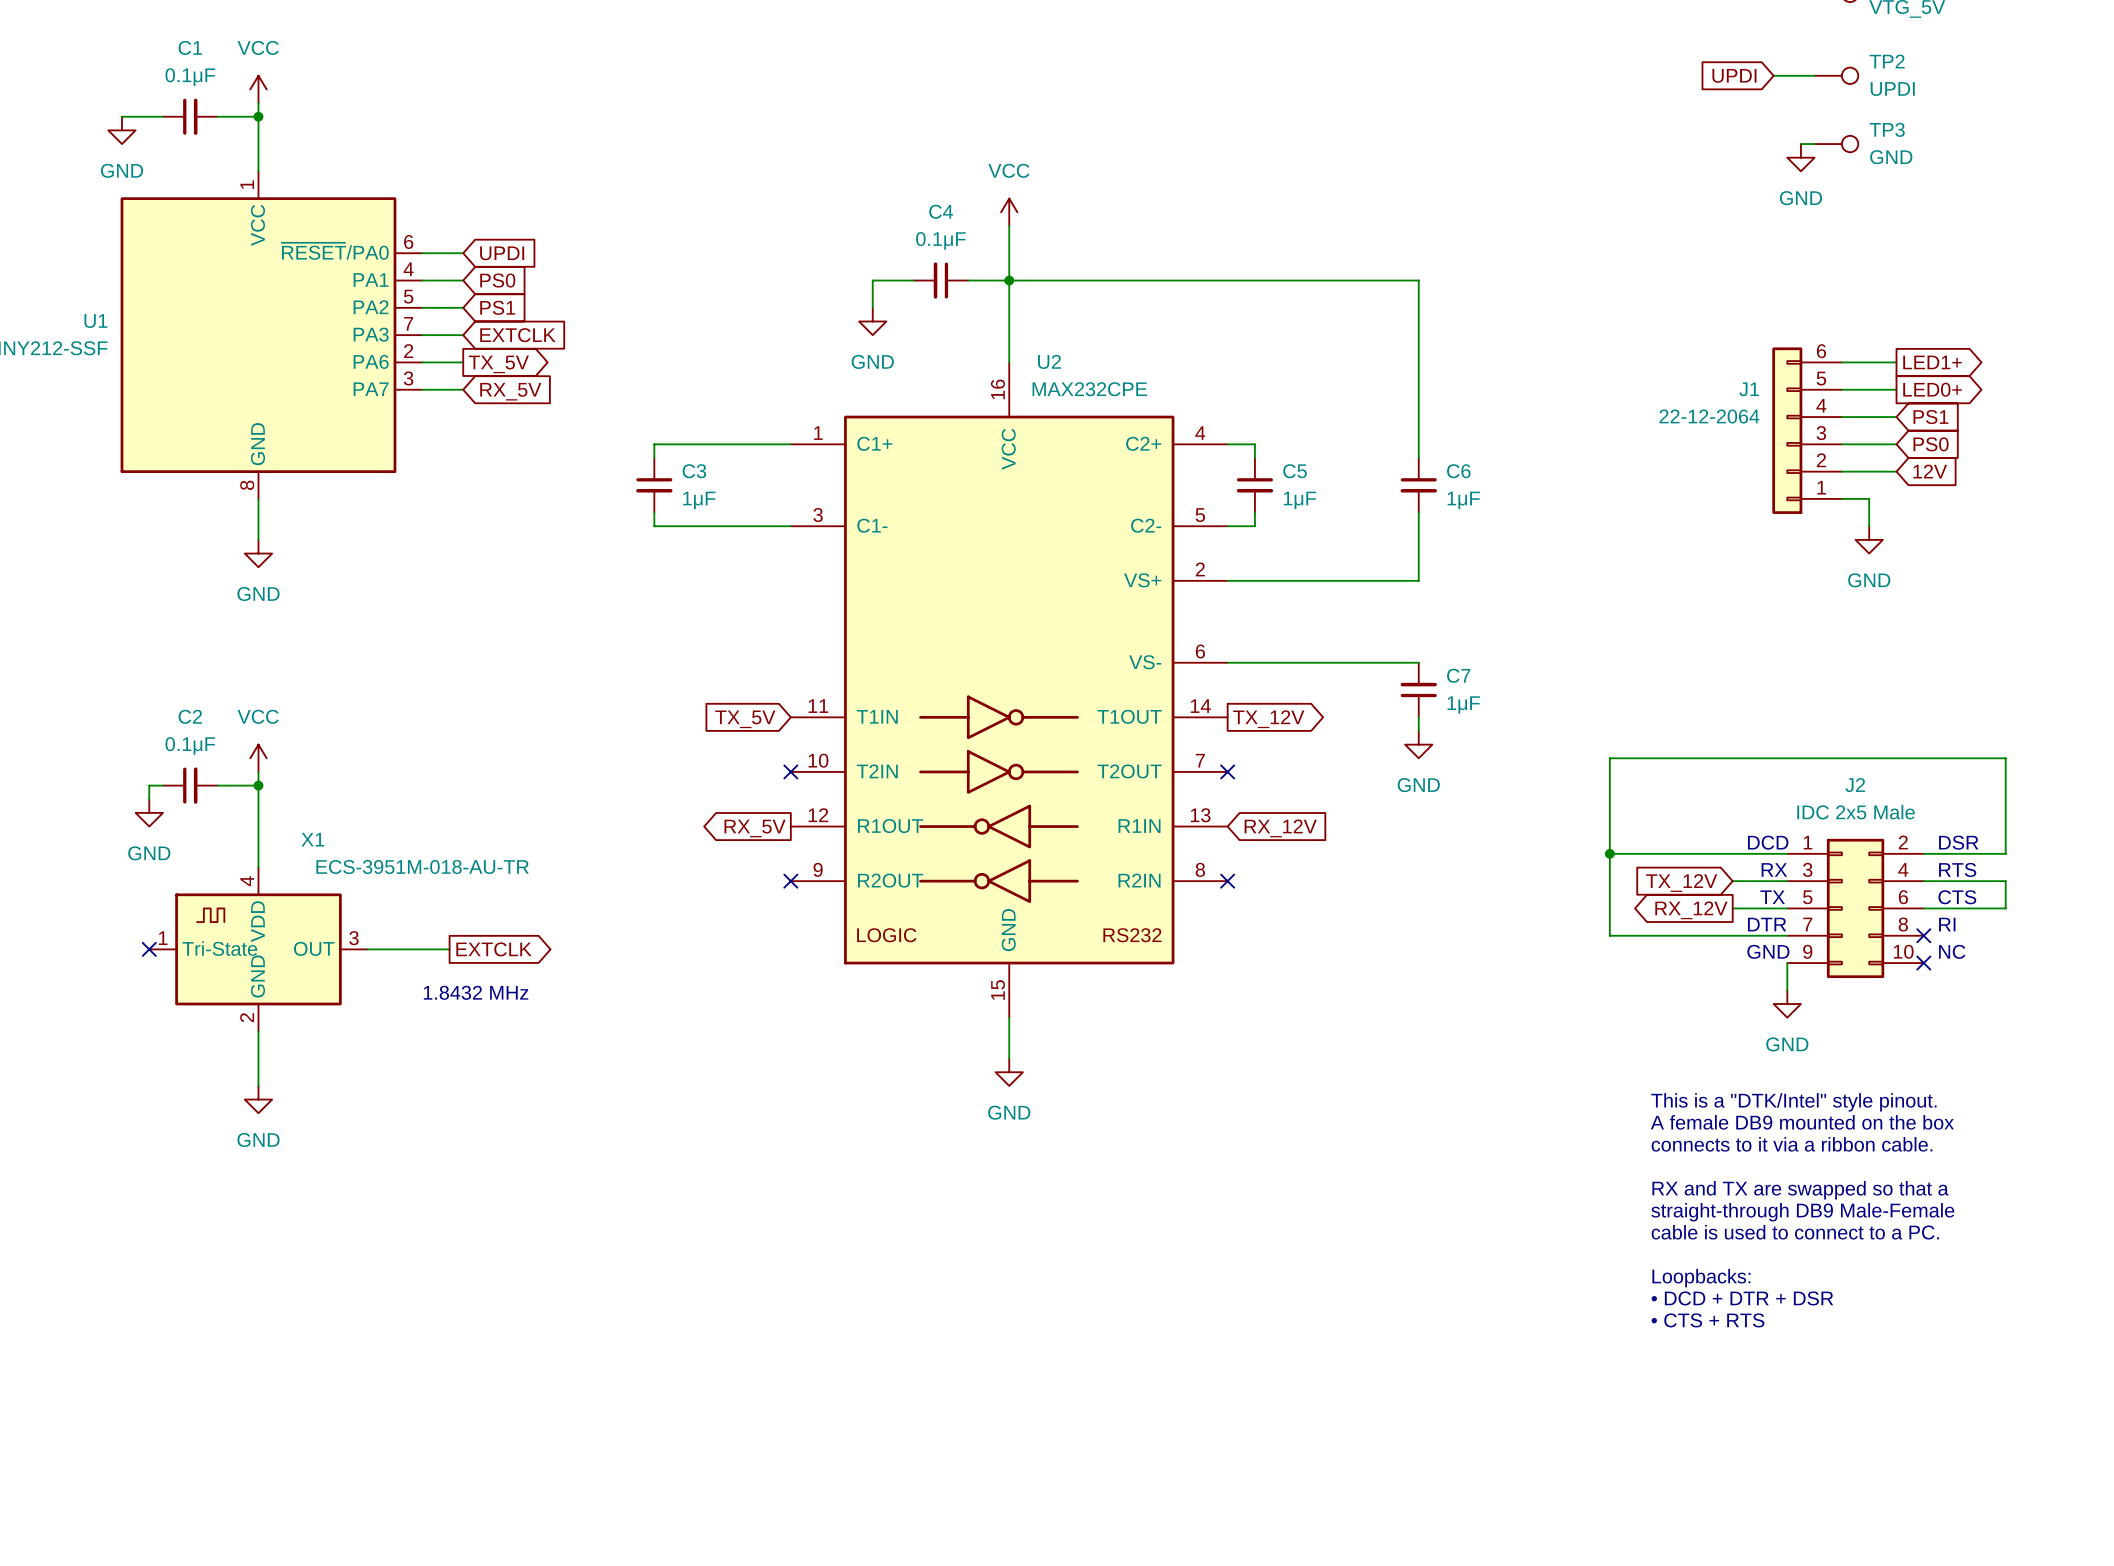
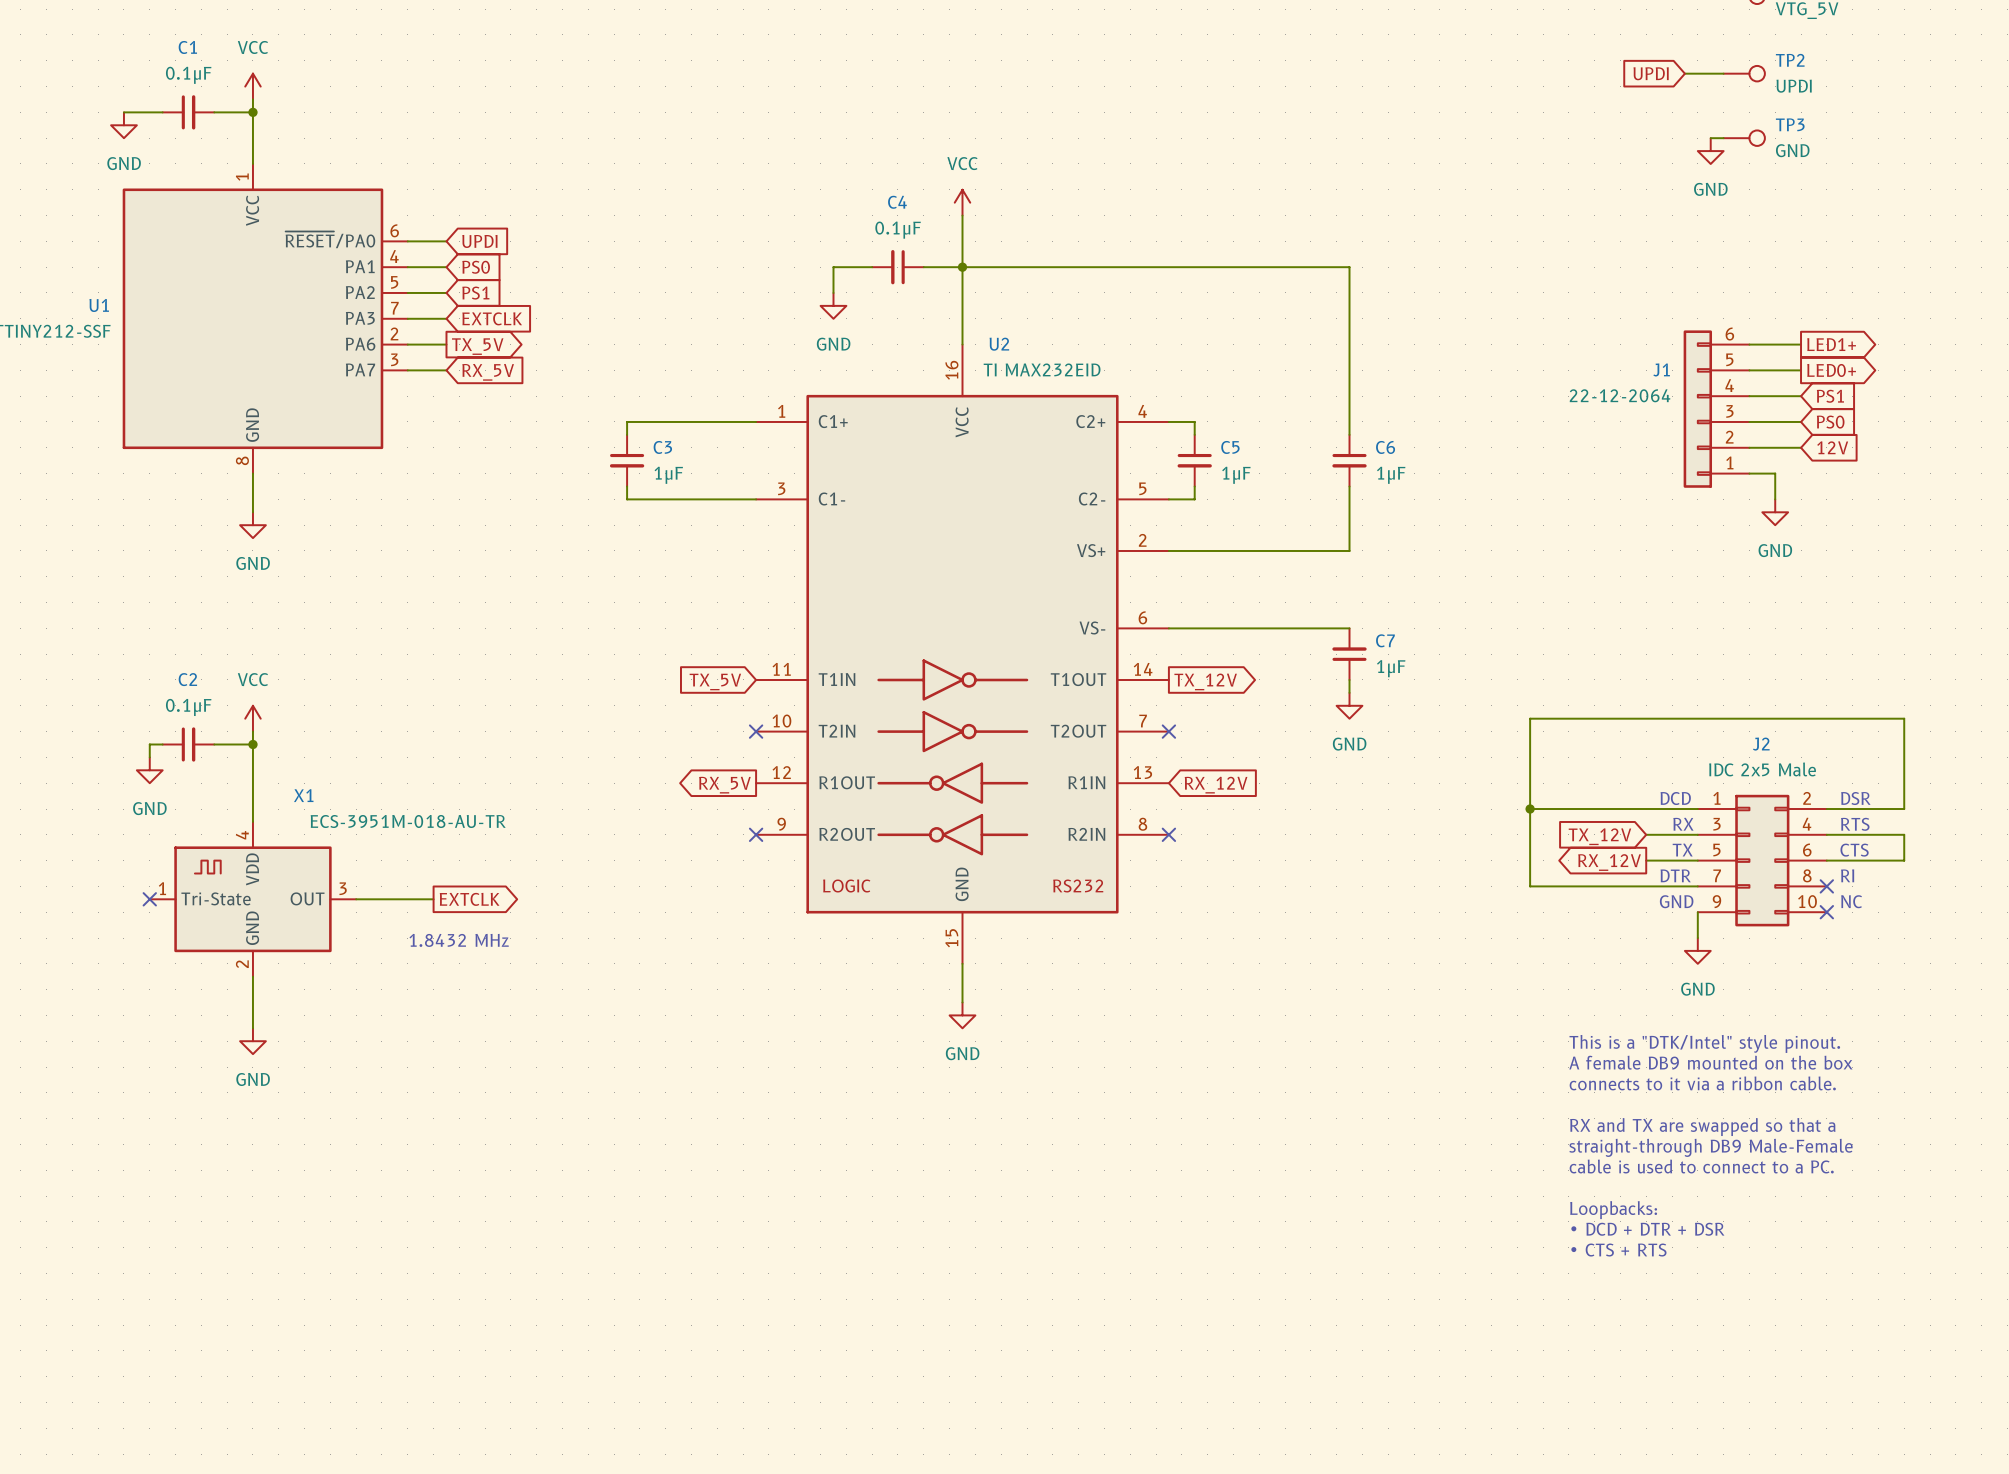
U2 value: MAX232CPE (1089, 389) -> TI MAX232EID (1042, 369)

